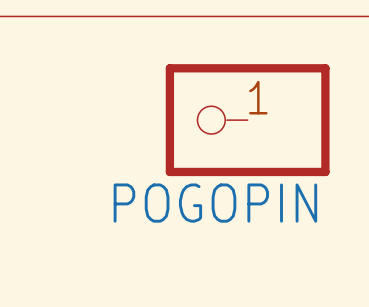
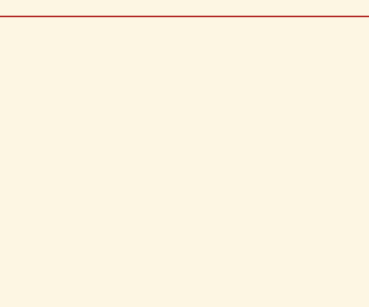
POGOPIN: (247, 120) -> none

